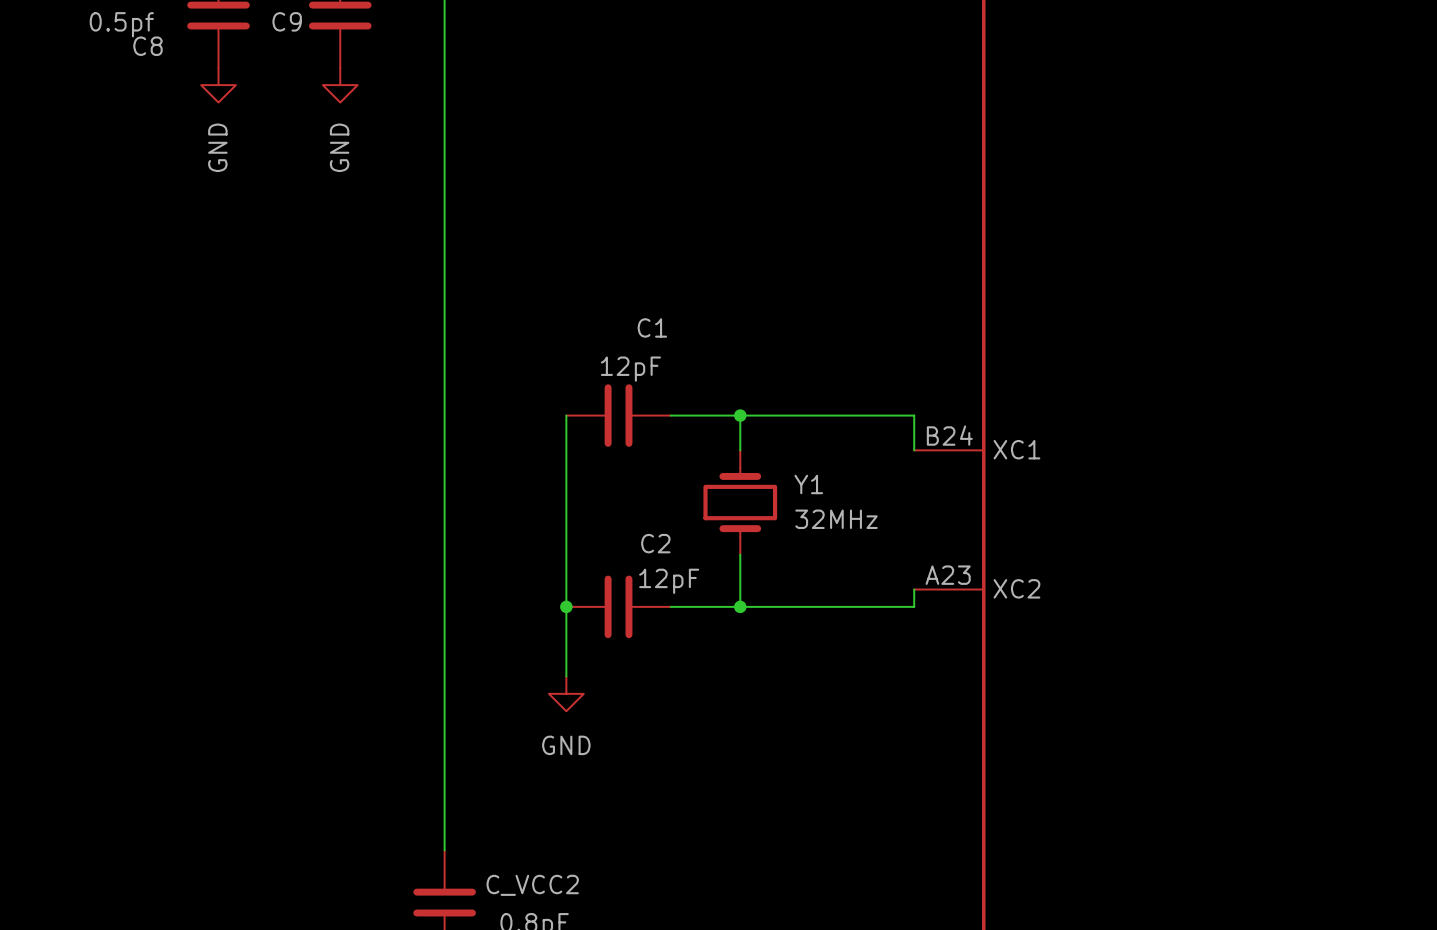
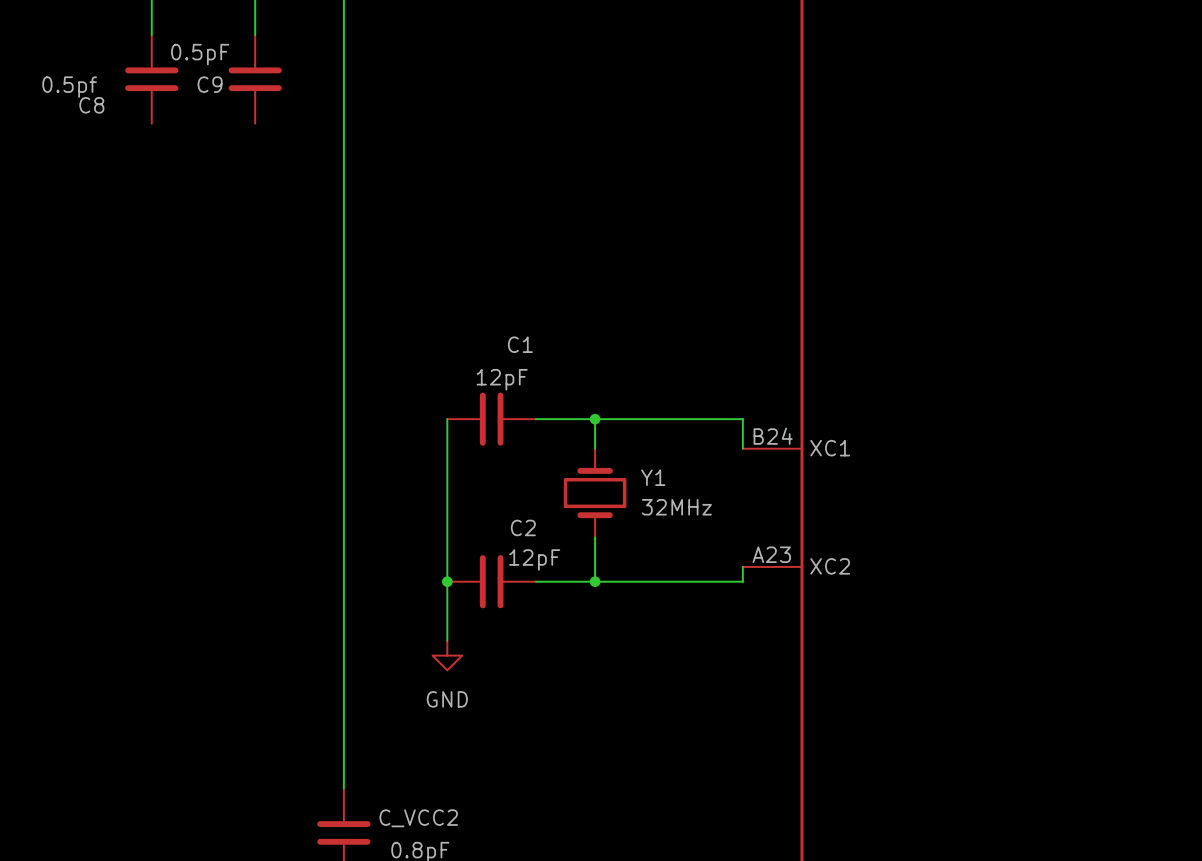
power symbol: GND (218, 85) -> none
power symbol: GND (340, 85) -> none

